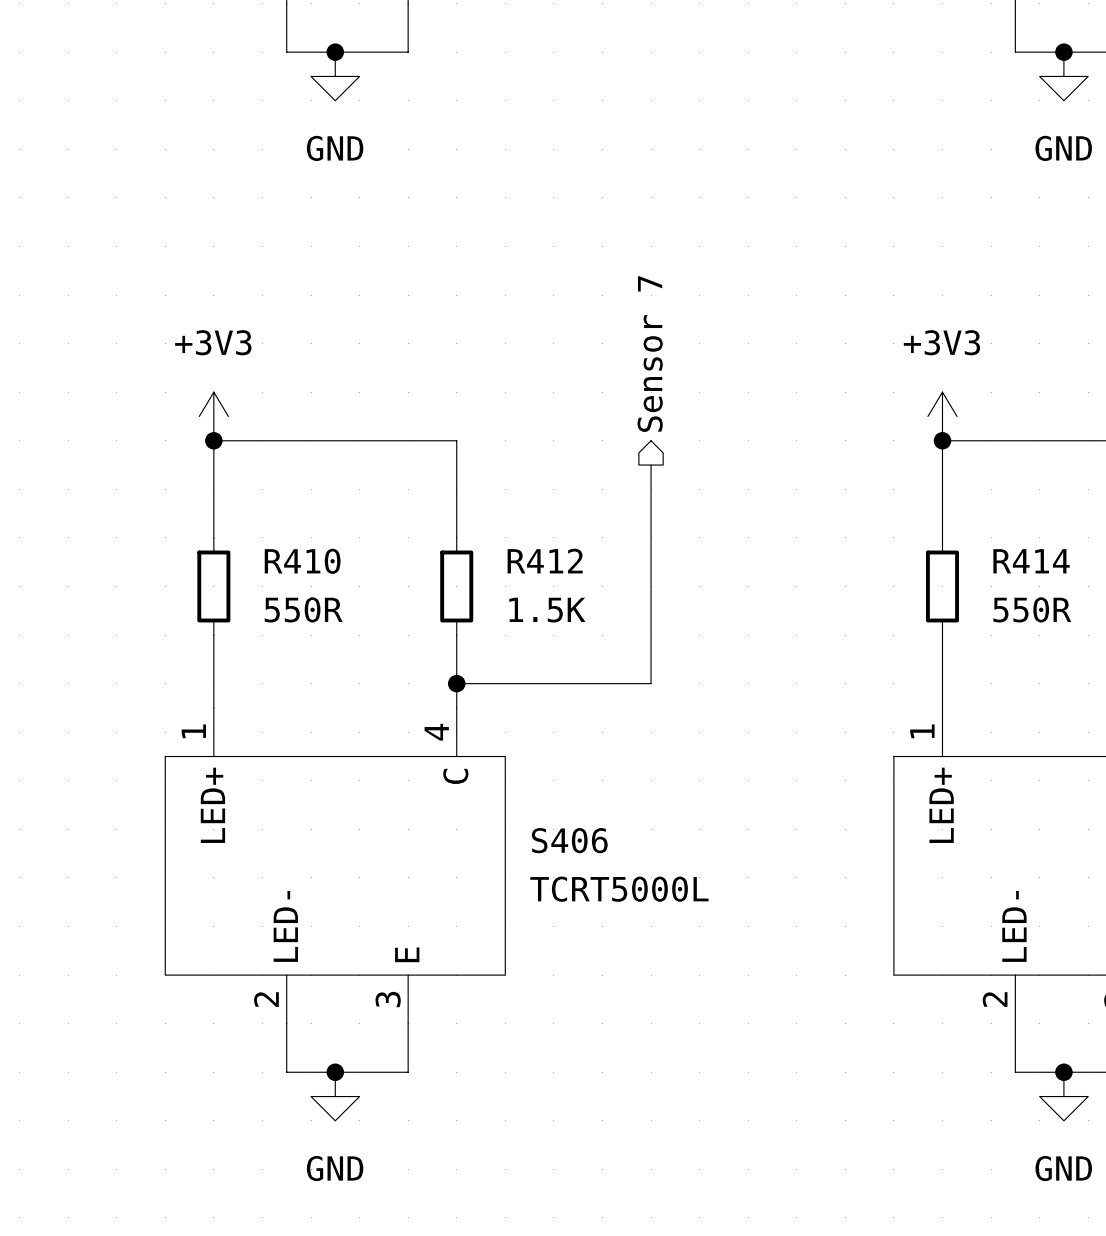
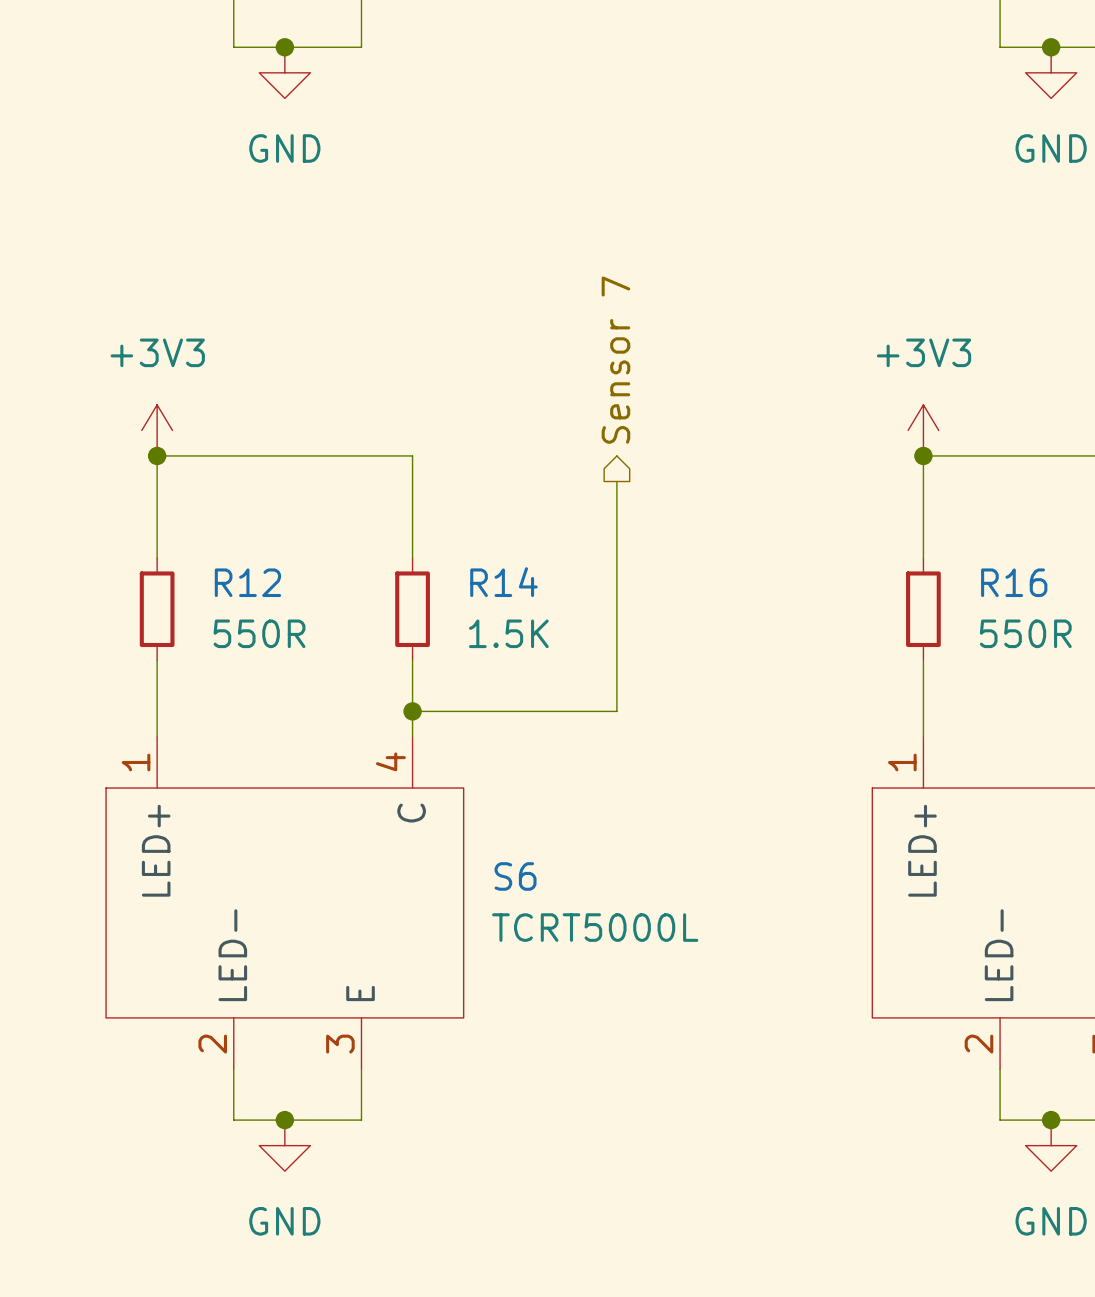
R410 name: R410 (302, 561) -> R12 (247, 582)
R412 name: R412 (545, 561) -> R14 (503, 582)
R414 name: R414 (1031, 561) -> R16 (1014, 582)
S406 name: S406 (569, 840) -> S6 (515, 876)

